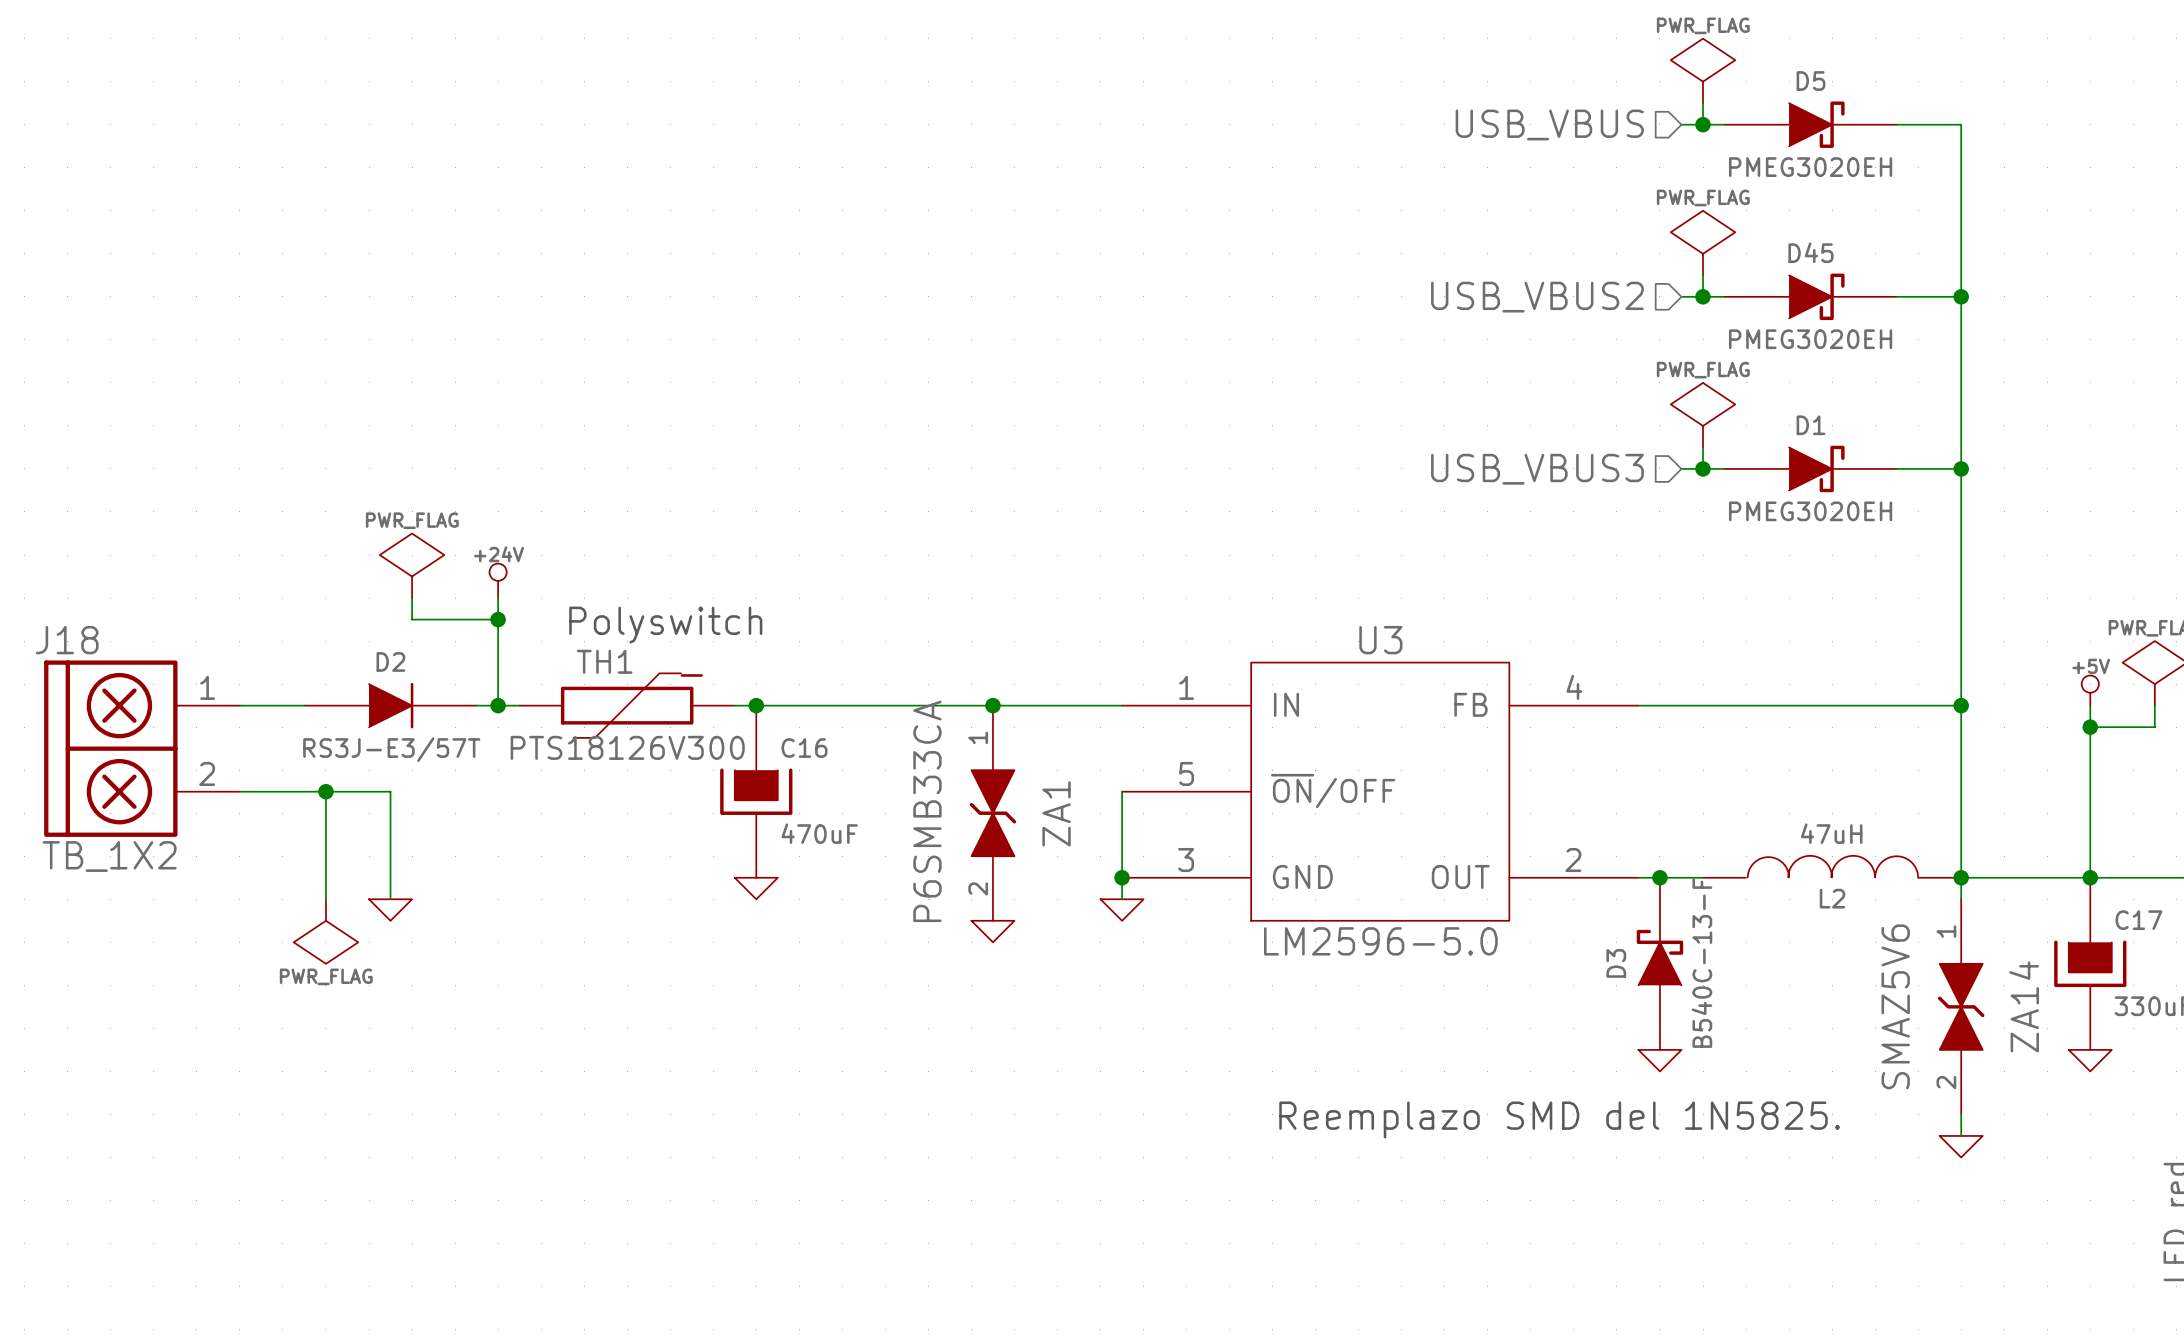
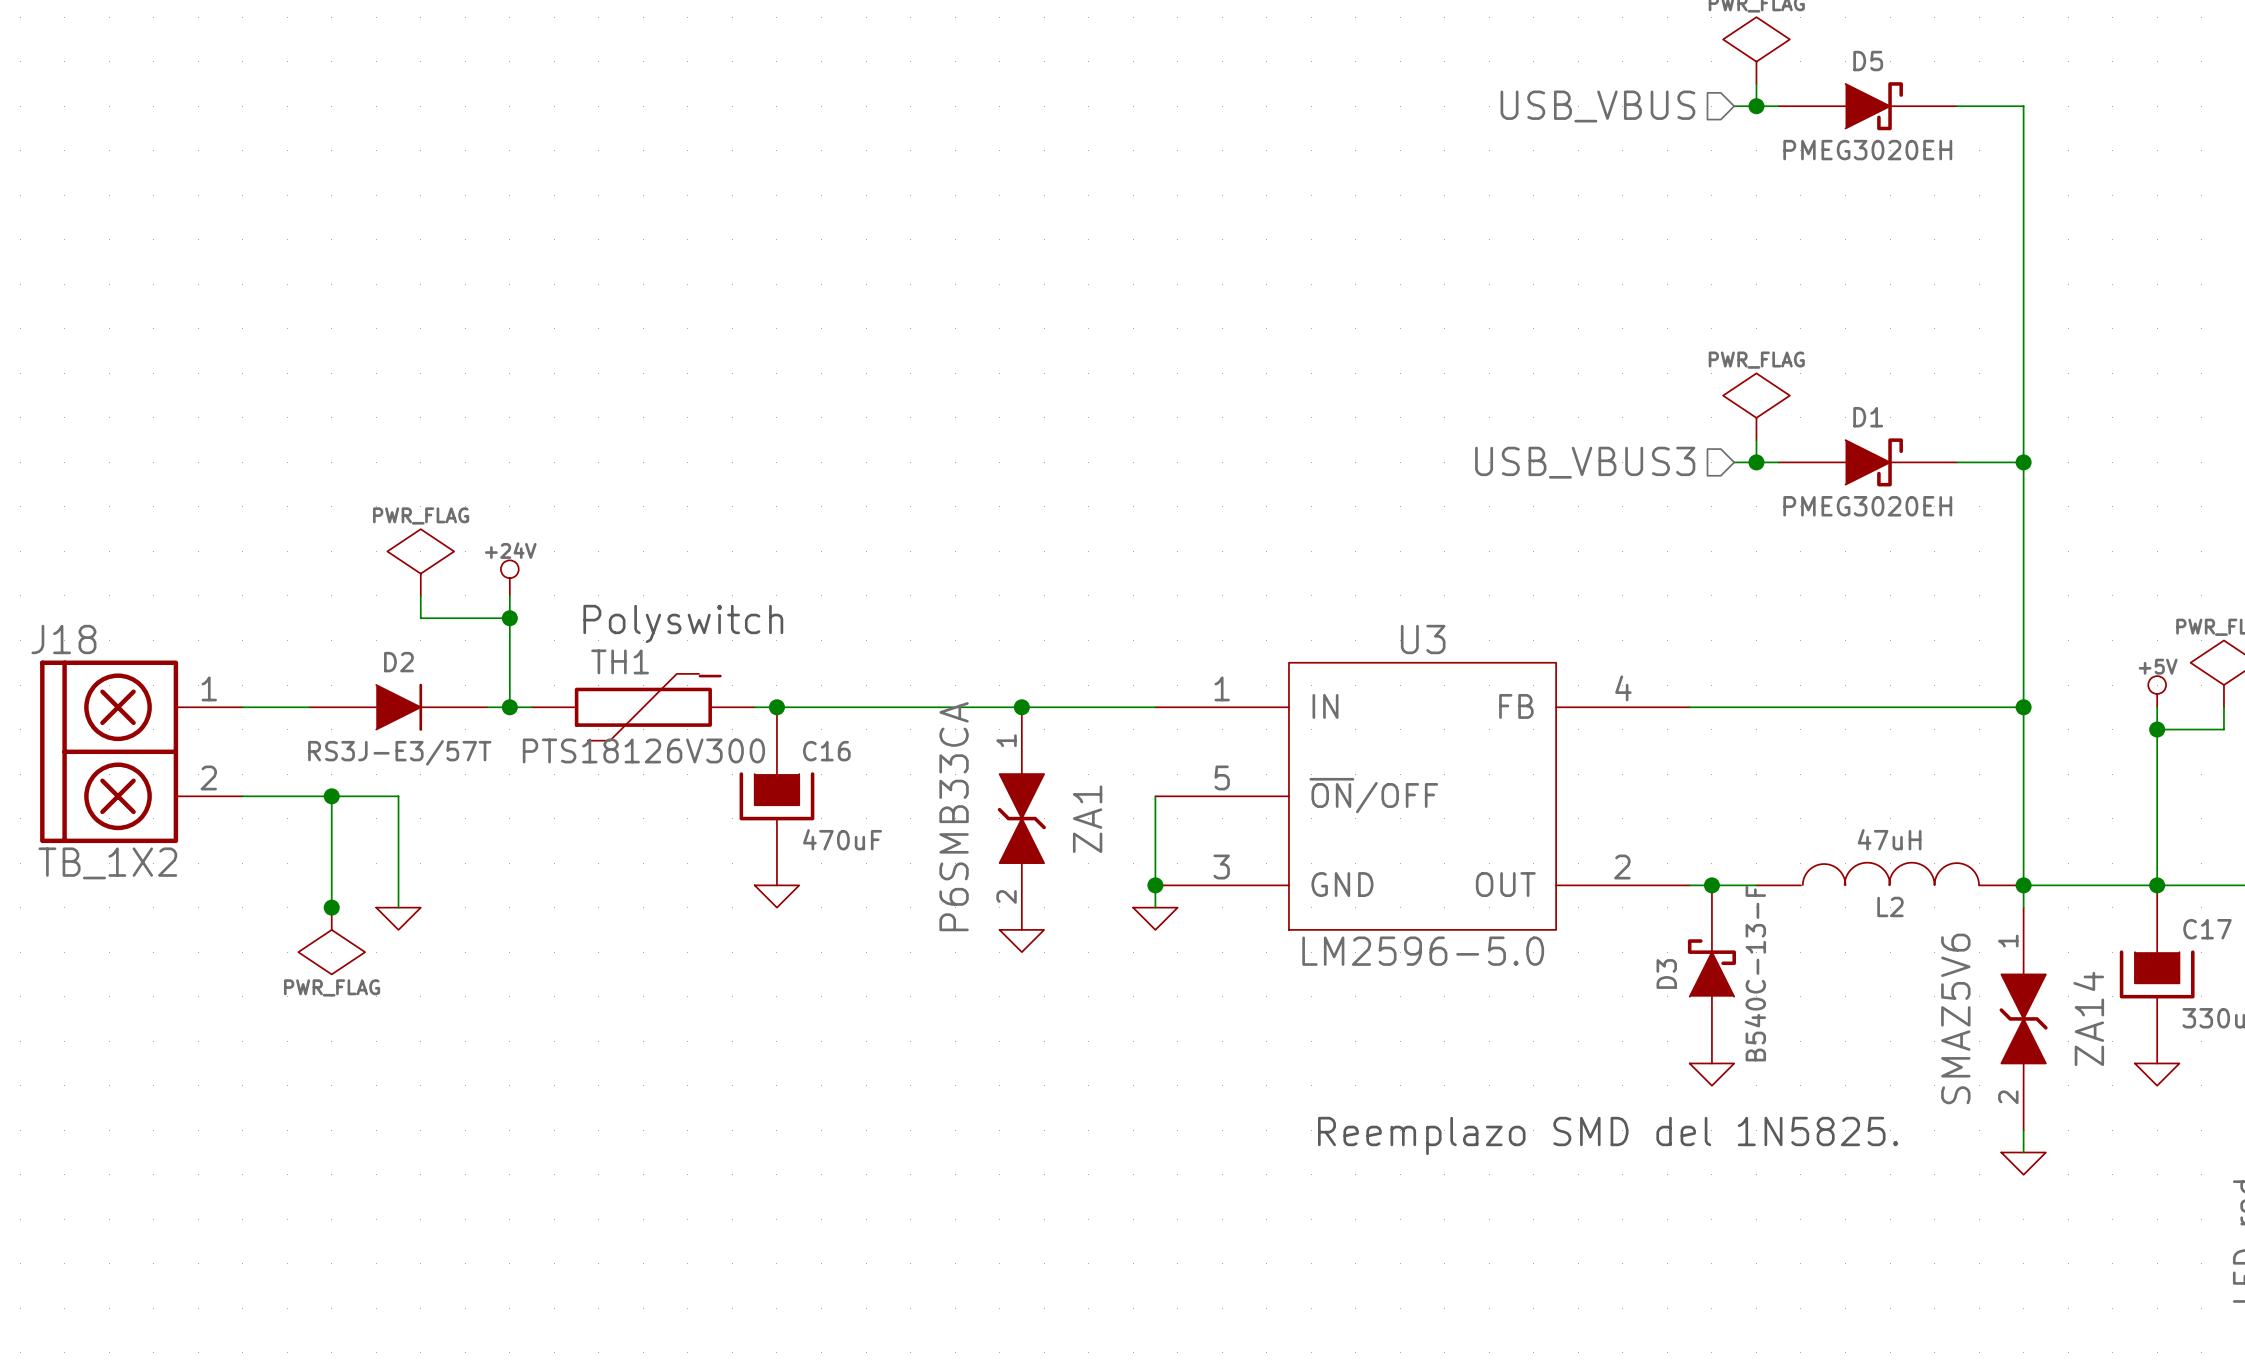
power symbol: PWR_FLAG (1703, 243) -> none
wire: (1703, 275) (1703, 296) -> none
wire: (1681, 296) (1724, 296) -> none
junction: (1703, 296) -> none
D45: PMEG3020EH (1810, 296) -> none
wire: (1896, 296) (1961, 296) -> none
junction: (1961, 296) -> none
hierarchical label: USB_VBUS2 (1537, 297) -> none
junction: none -> (331, 907)

